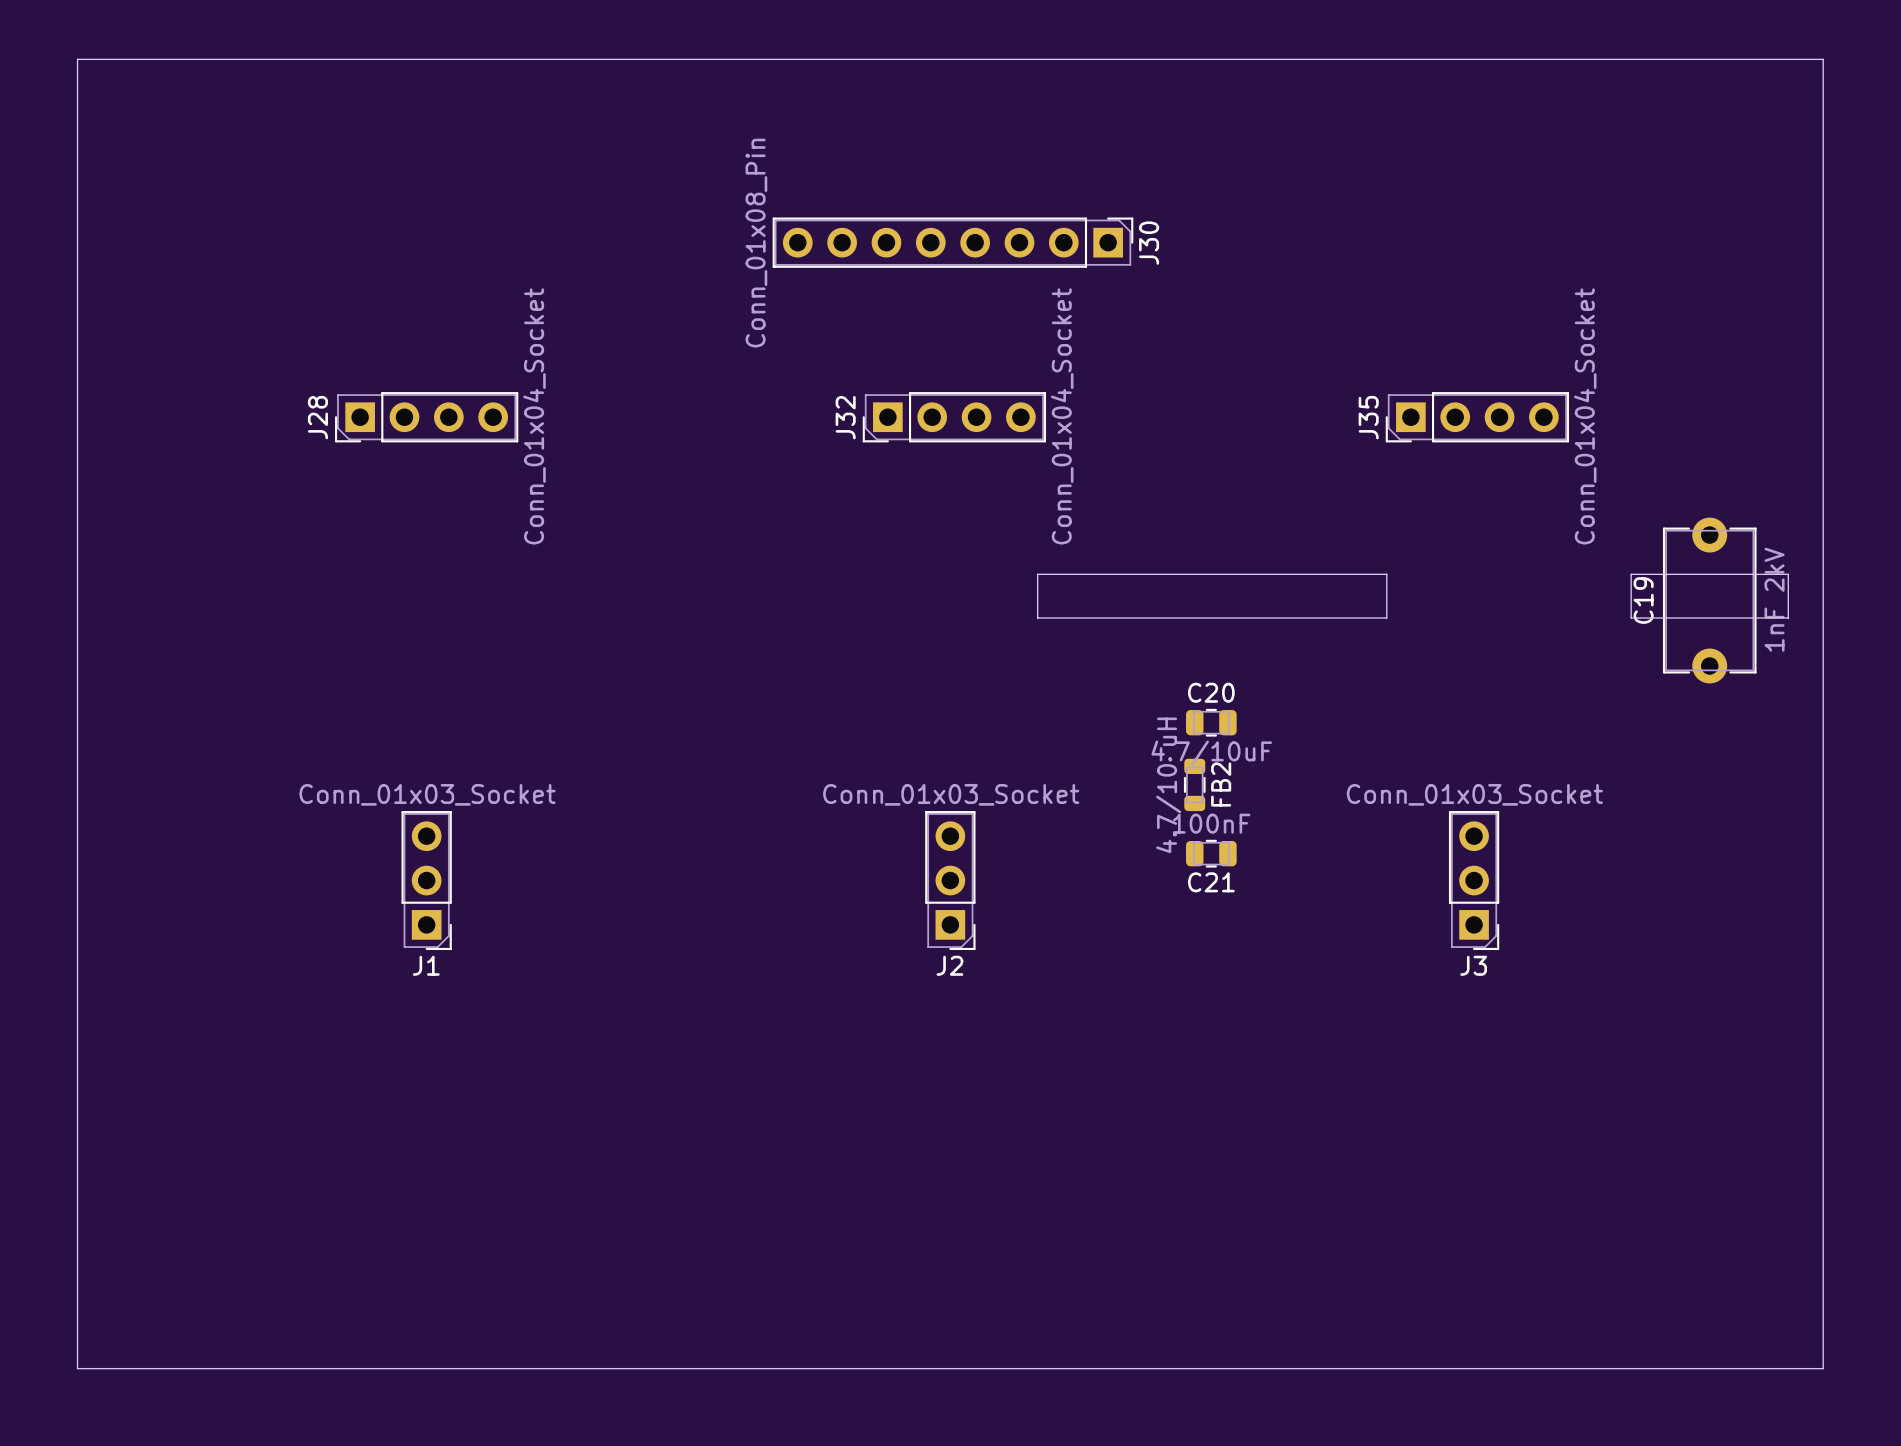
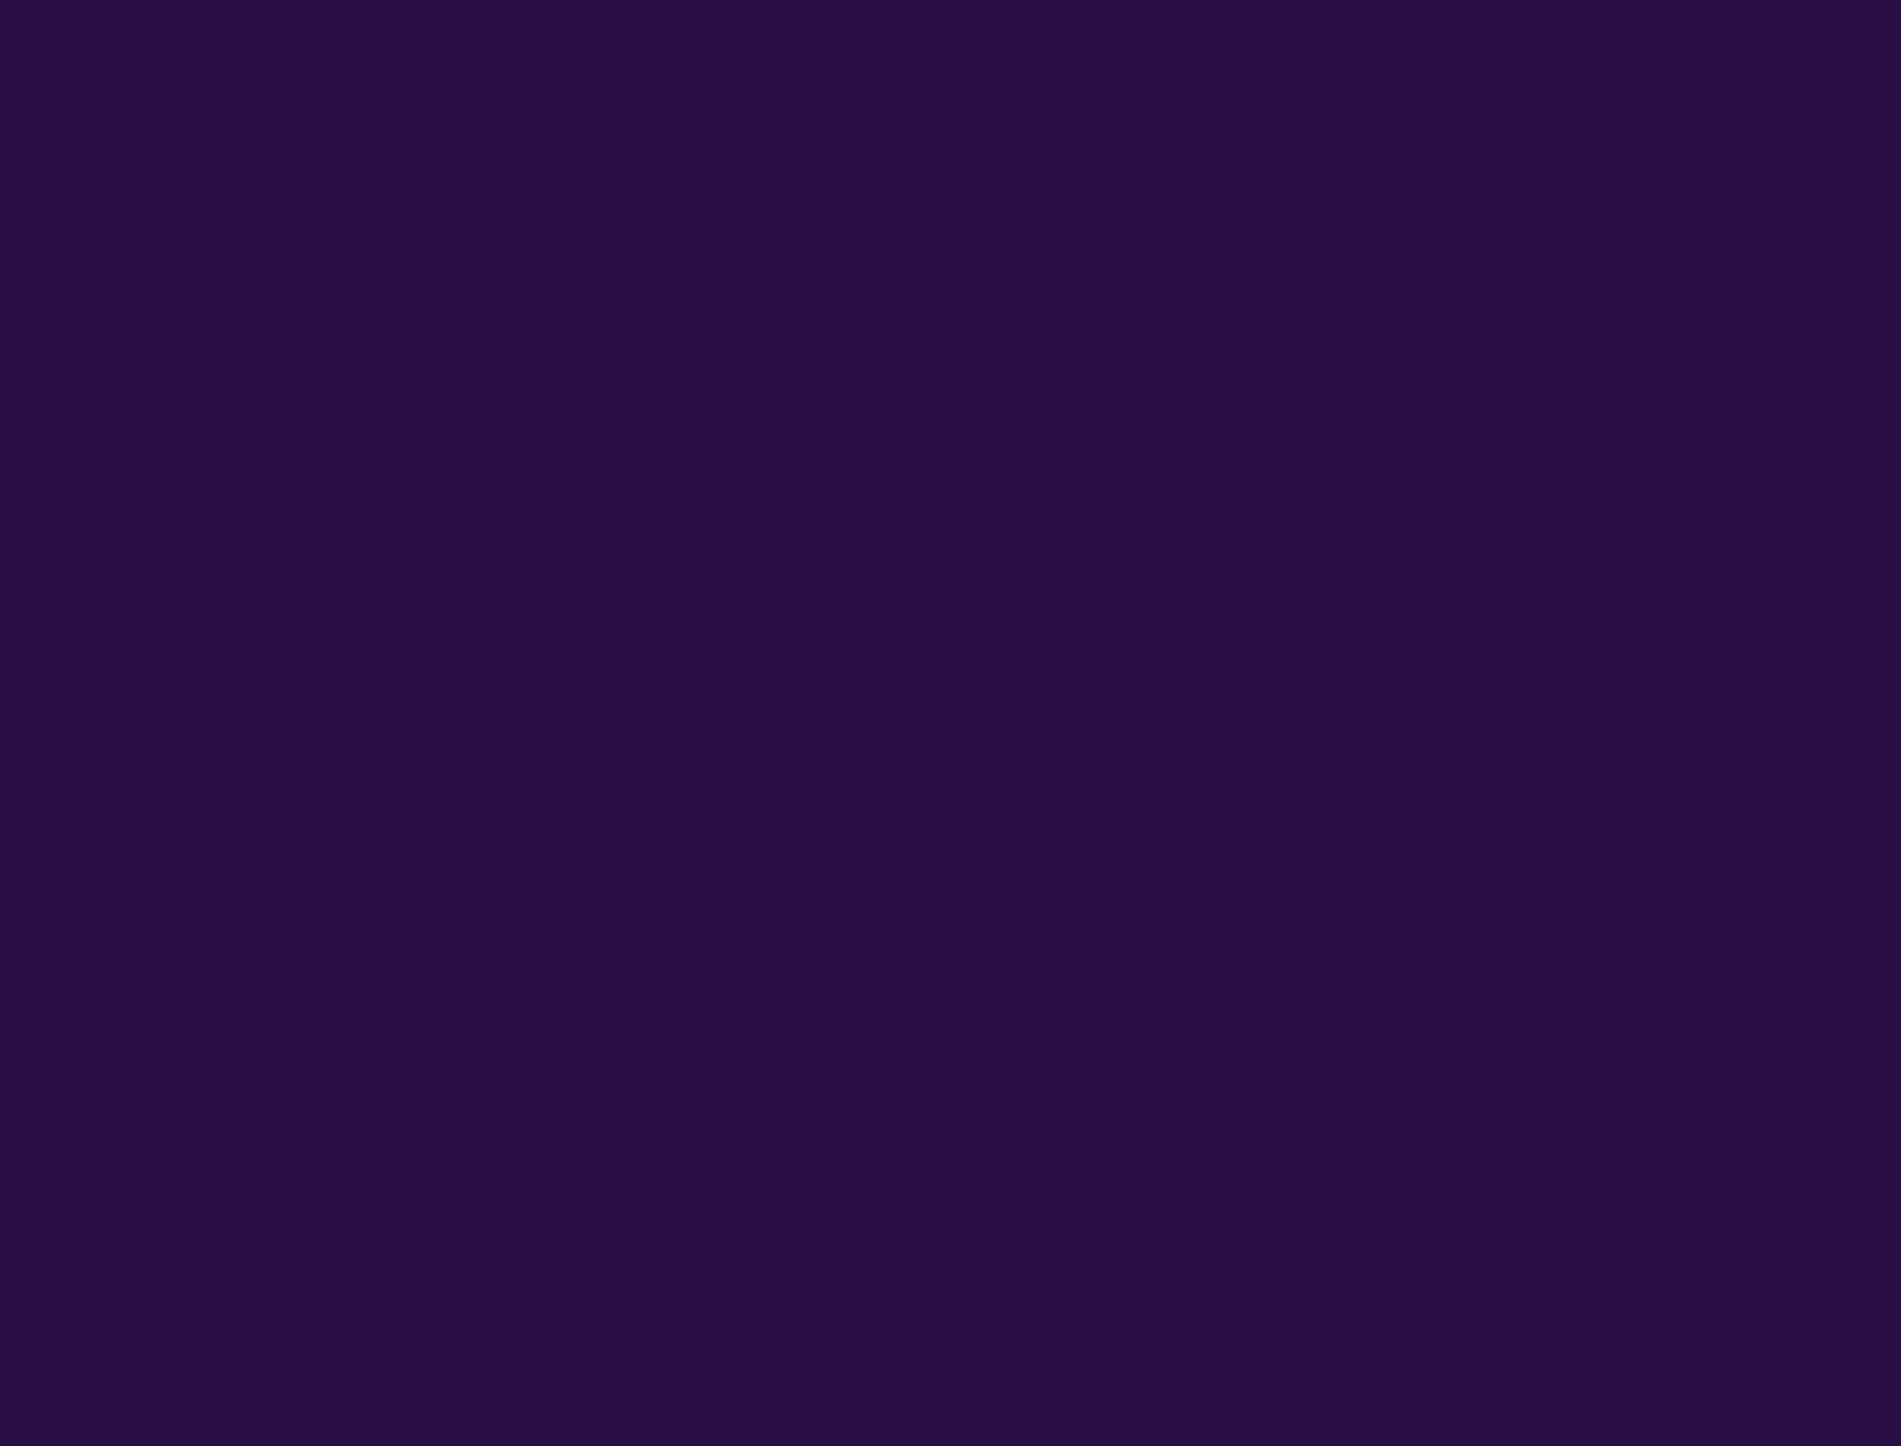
board edge: (77, 59) (1823, 59) (1823, 1368) (77, 1368) (77, 59) -> none
J30: Conn_01x08_Pin (952, 242) -> none
J28: Conn_01x04_Socket (426, 417) -> none
J32: Conn_01x04_Socket (954, 417) -> none
J35: Conn_01x04_Socket (1477, 417) -> none
board edge: (1037, 574) (1386, 574) (1386, 617) (1037, 617) (1037, 574) -> none
board edge: (1631, 574) (1788, 574) (1788, 617) (1631, 617) (1631, 574) -> none
C19: 1nF 2kV (1709, 600) -> none
C20: 4.7/10uF (1211, 722) -> none
FB2: 4.7/10 uH (1194, 784) -> none
C21: 100nF (1211, 853) -> none
J1: Conn_01x03_Socket (426, 880) -> none
J2: Conn_01x03_Socket (950, 880) -> none
J3: Conn_01x03_Socket (1474, 880) -> none

